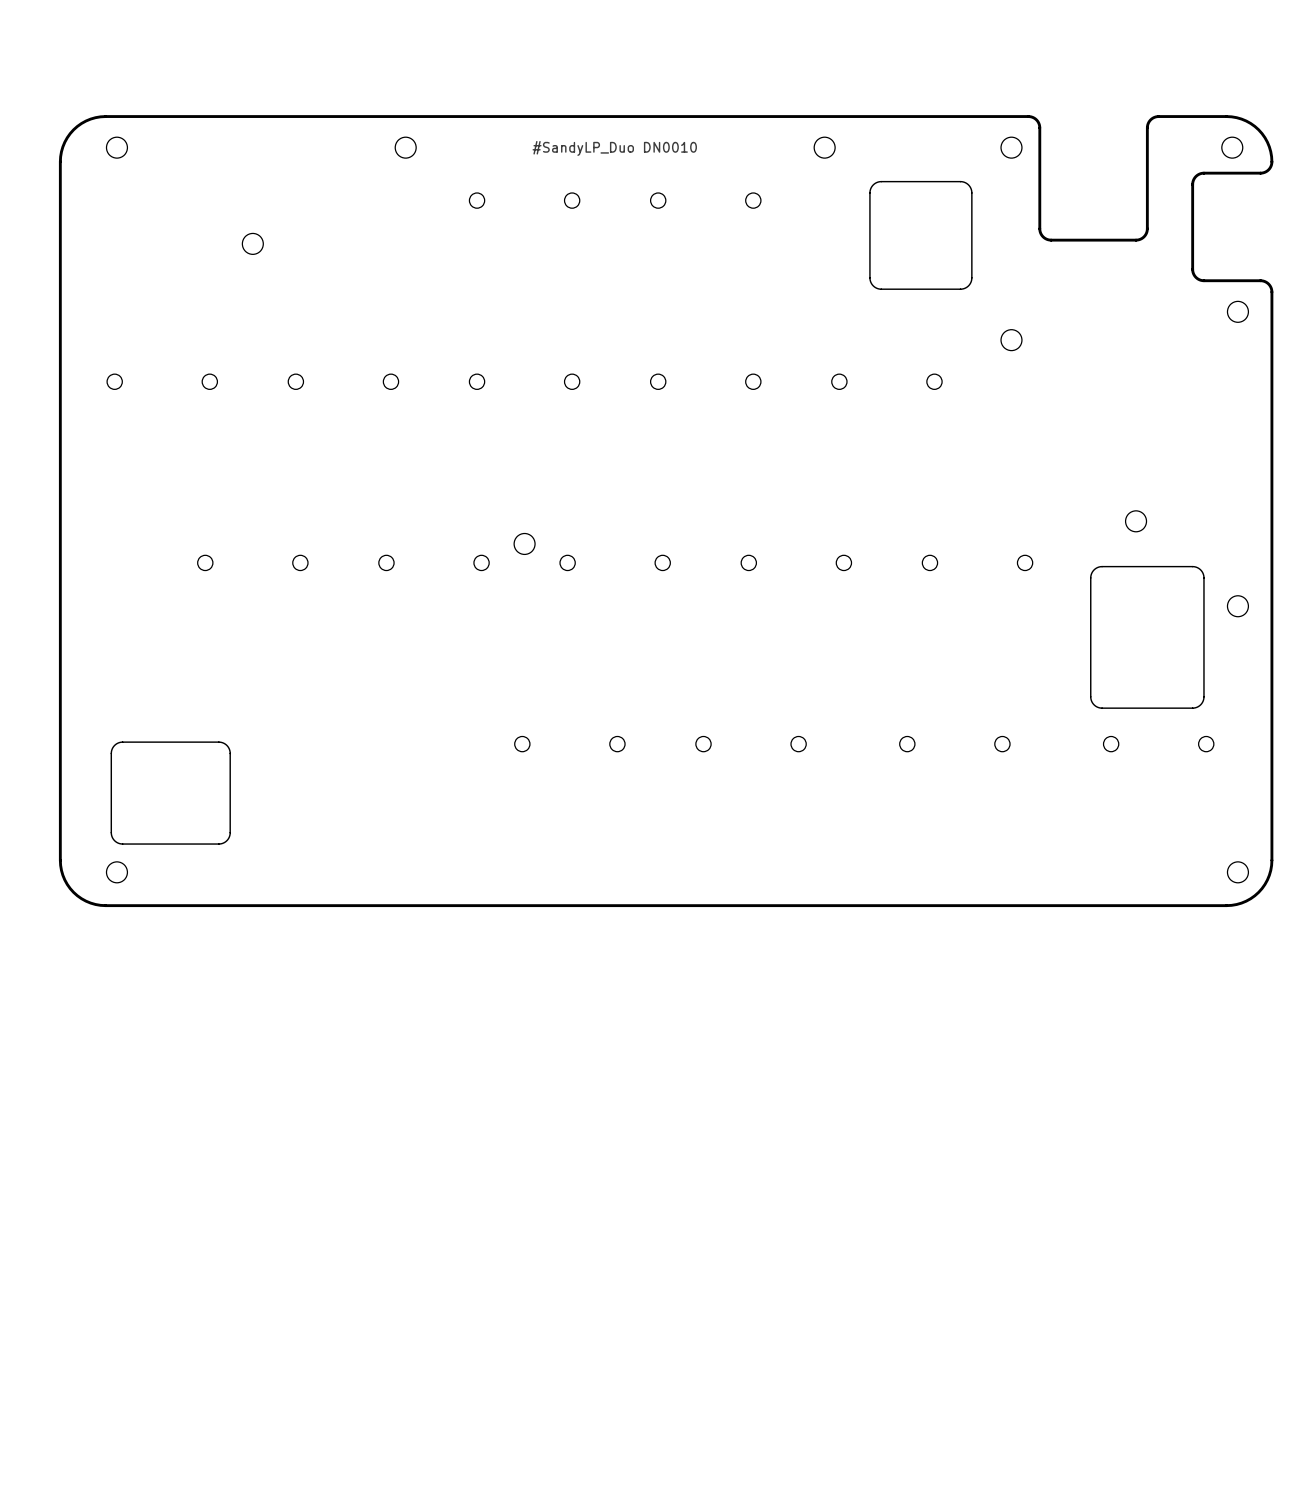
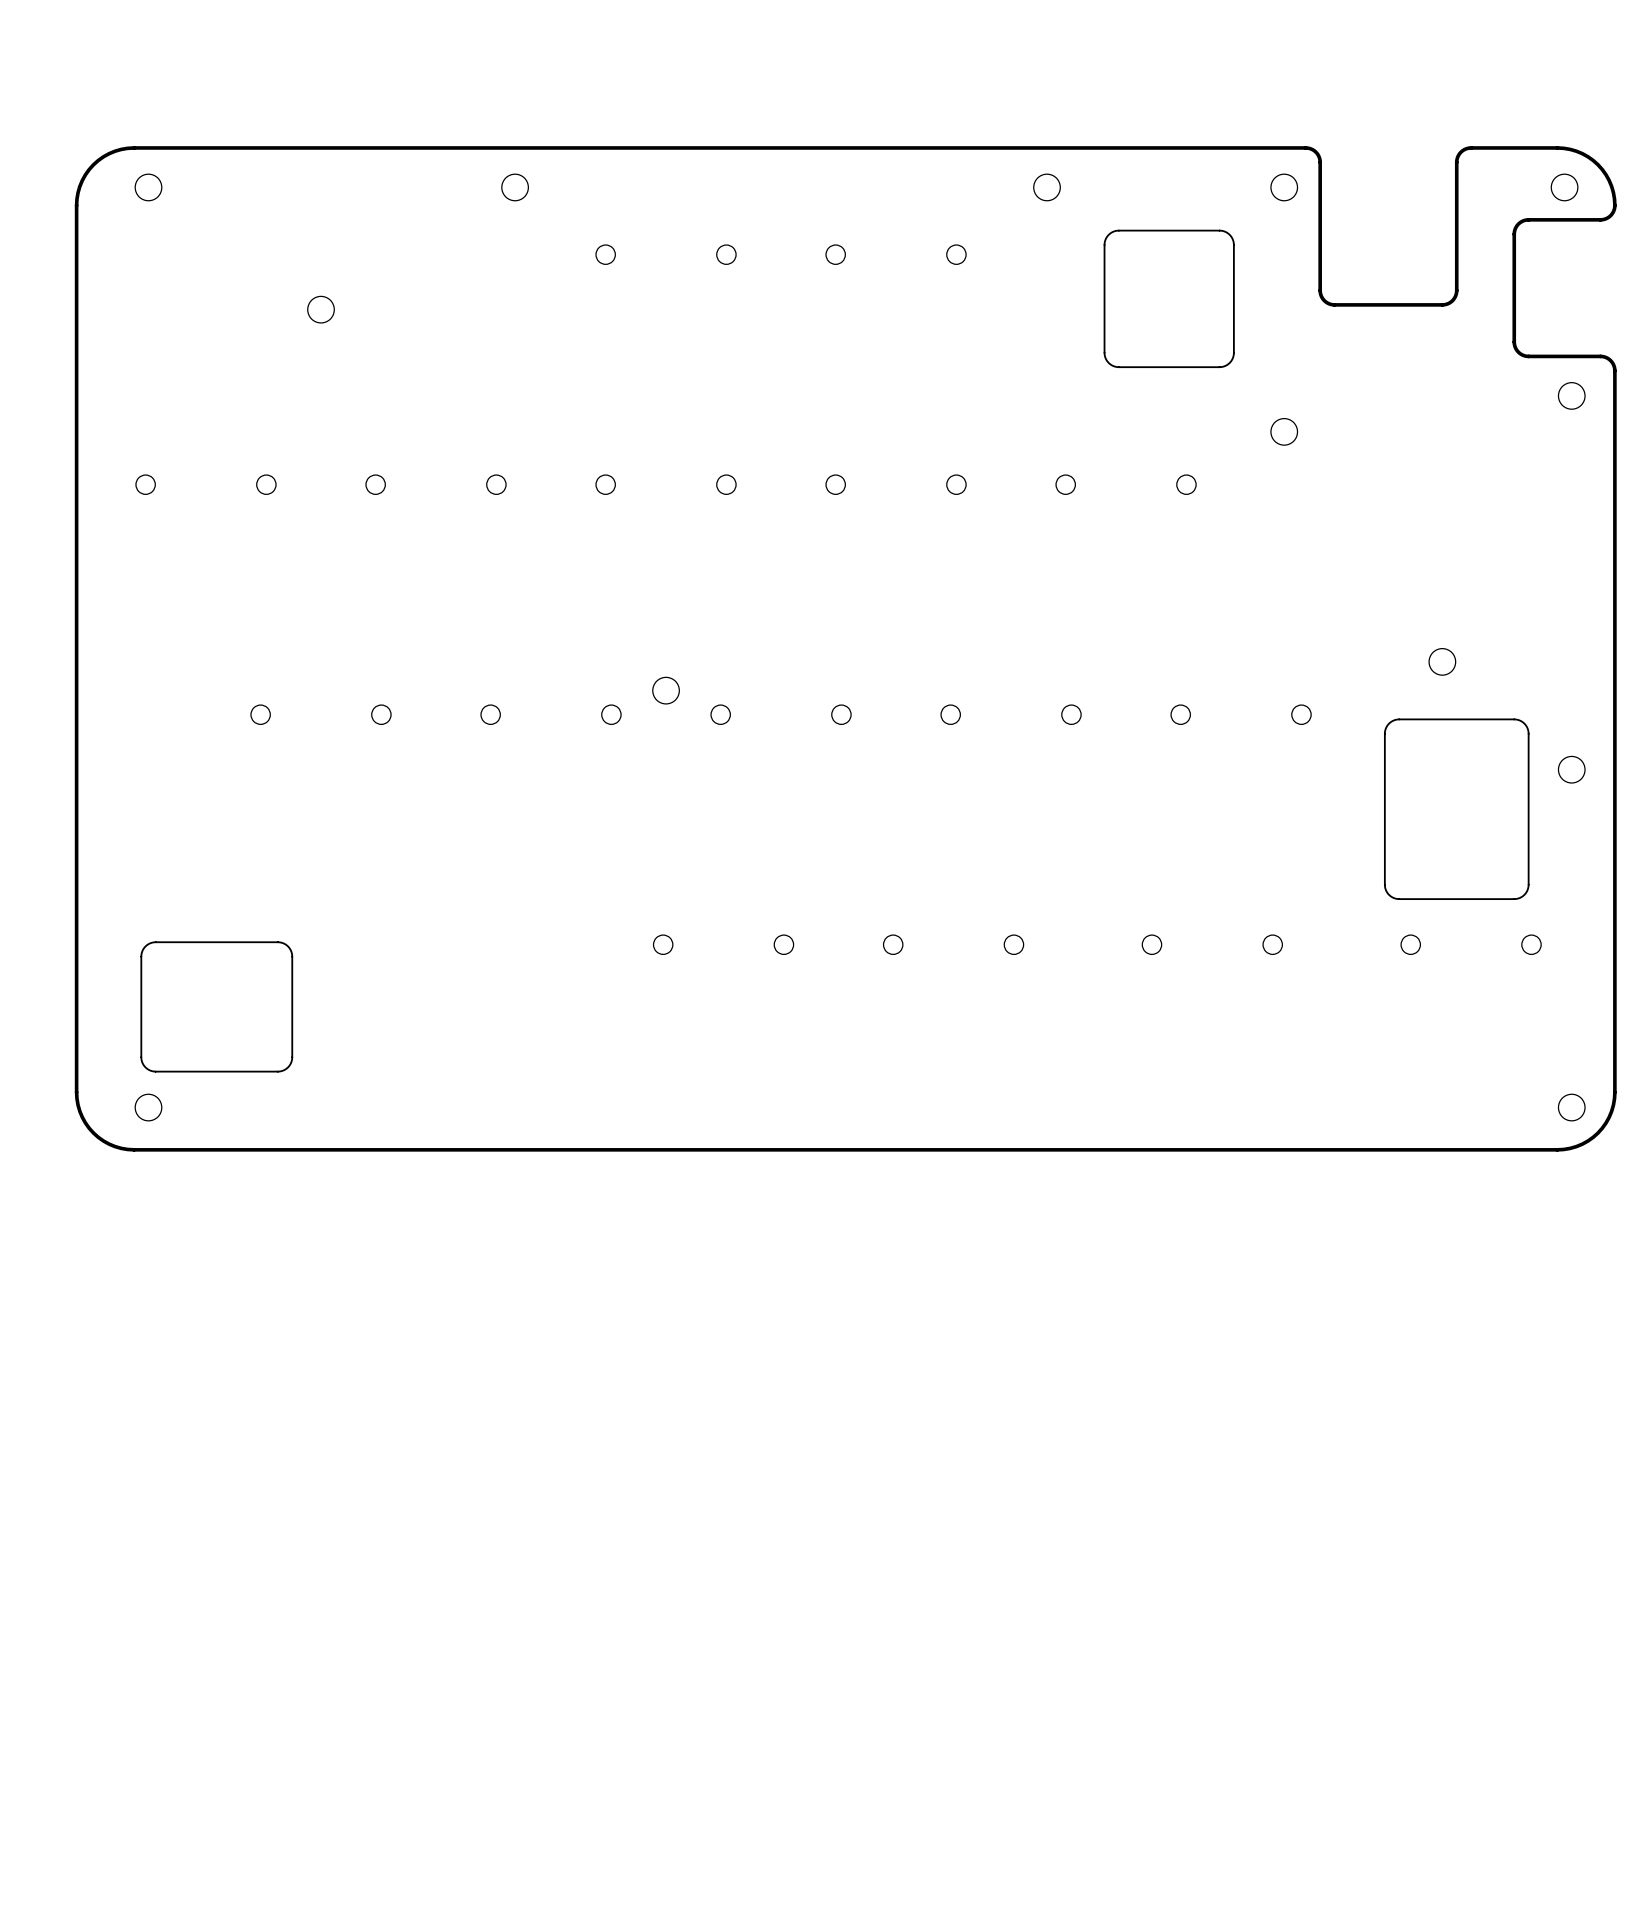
text: #SandyLP_Duo DN0010 (614, 148) -> none

